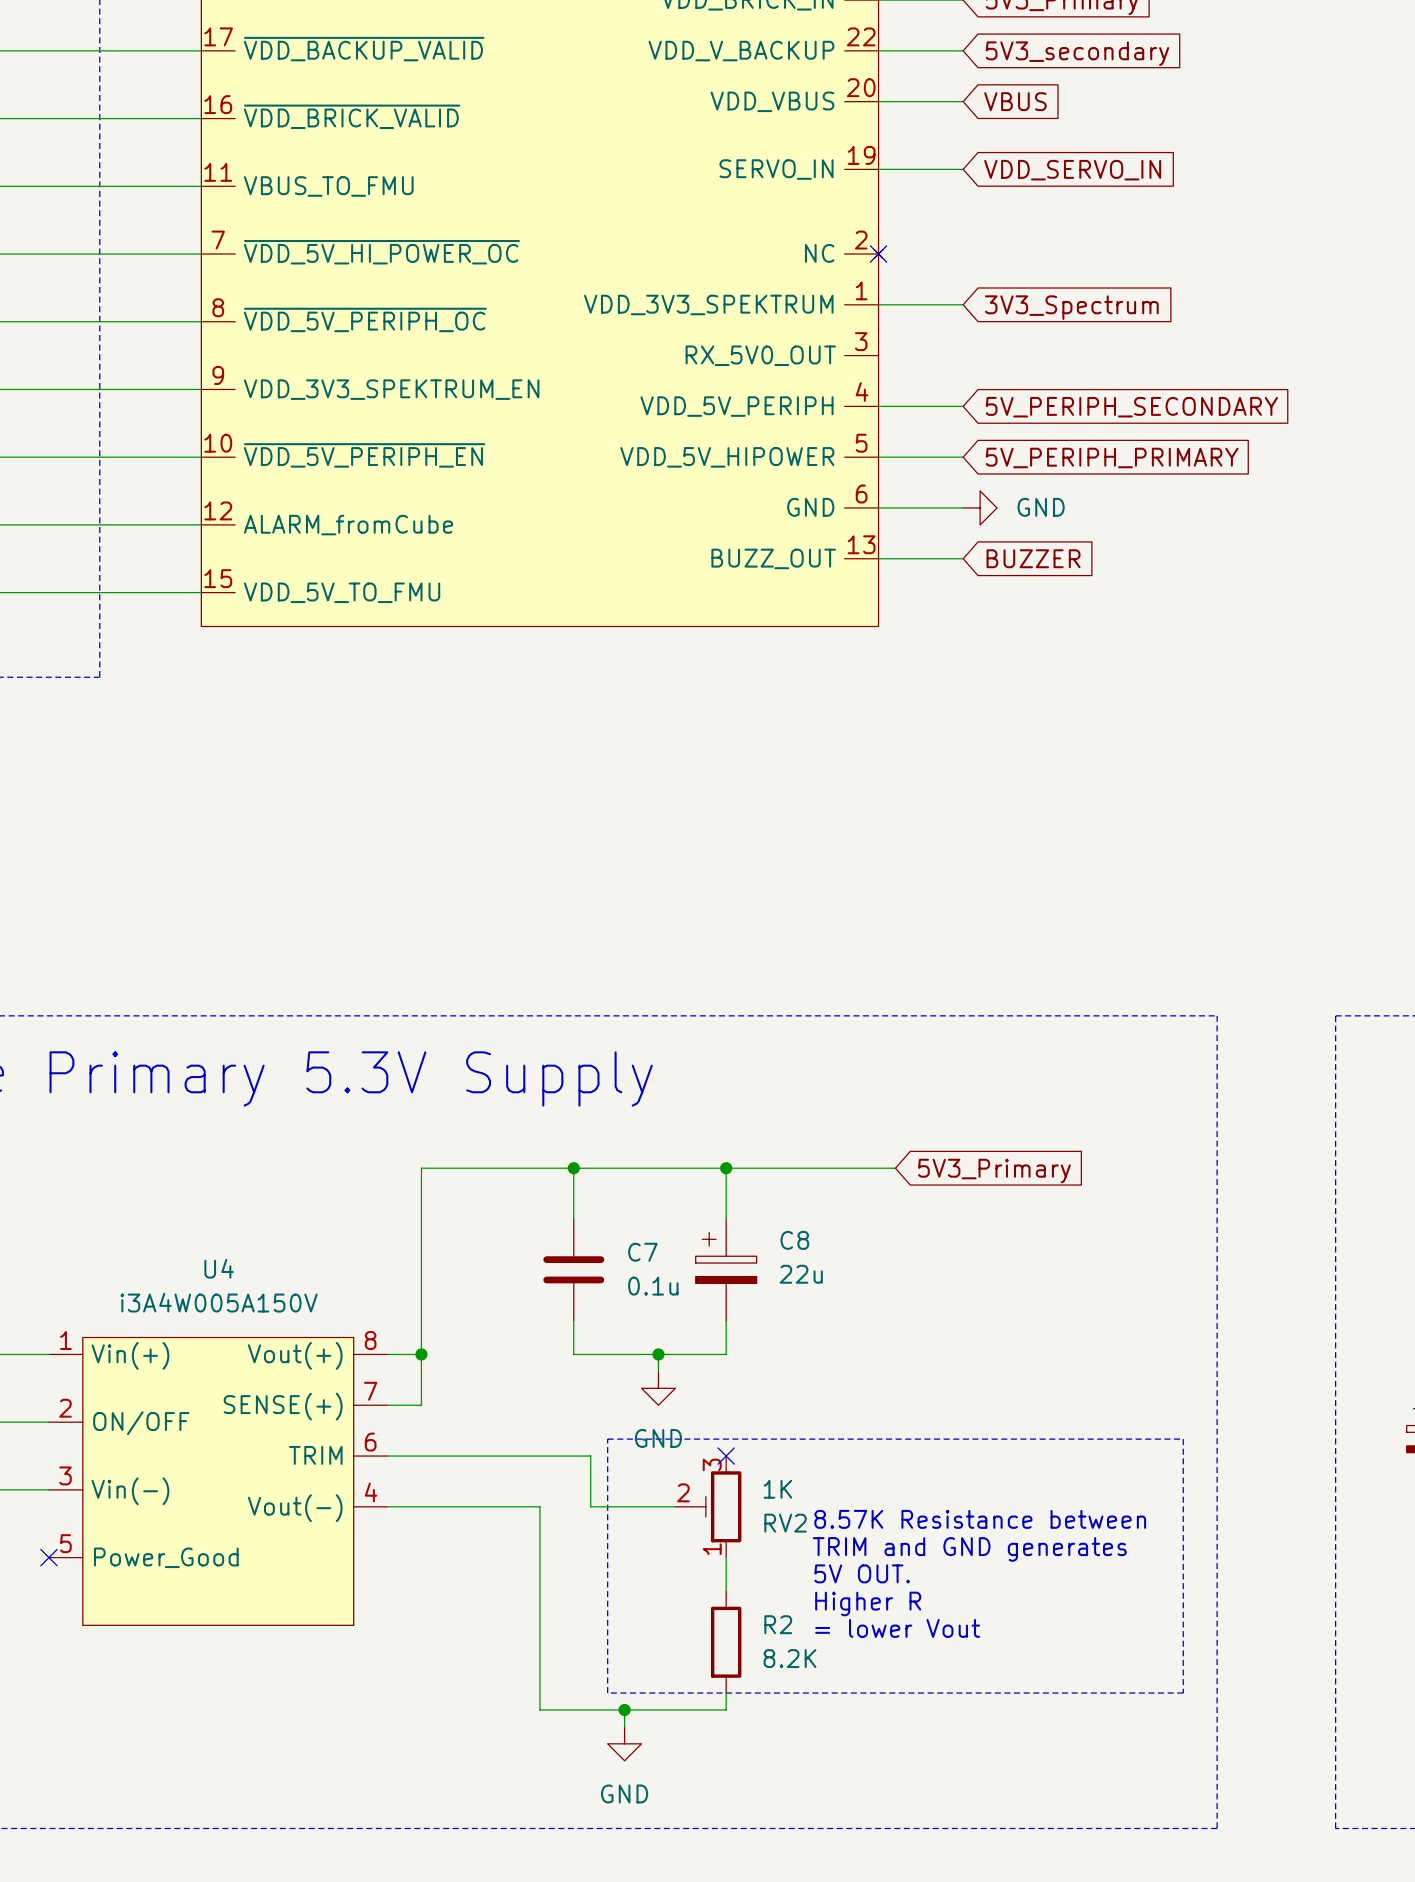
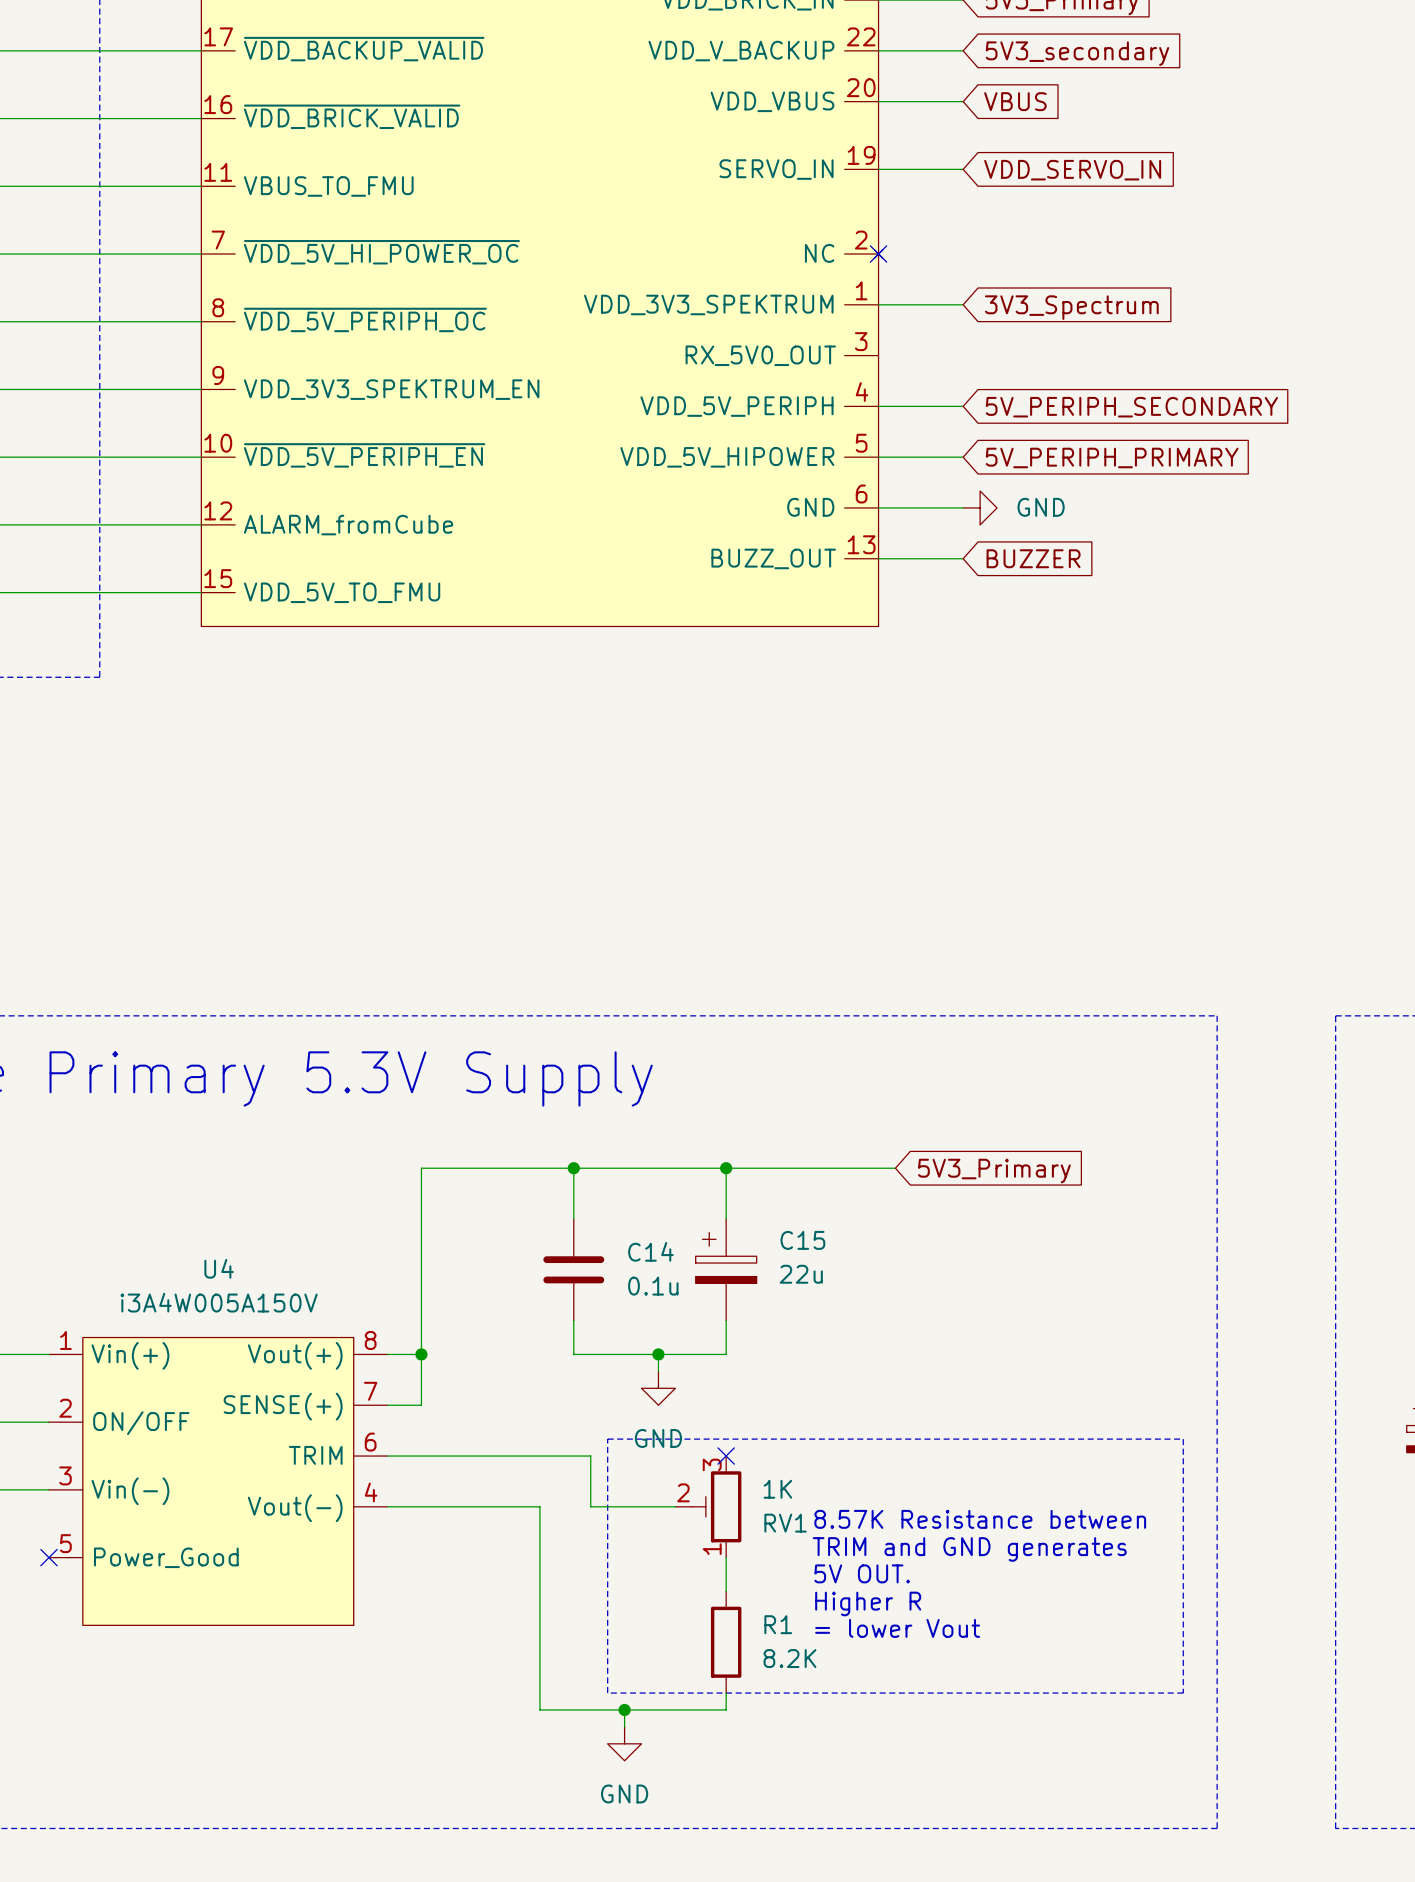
C8 name: C8 (794, 1240) -> C15 (802, 1240)
C7 name: C7 (642, 1252) -> C14 (650, 1251)
RV2 name: RV2 (785, 1523) -> RV1 (785, 1523)
R2 name: R2 (778, 1624) -> R1 (778, 1624)

